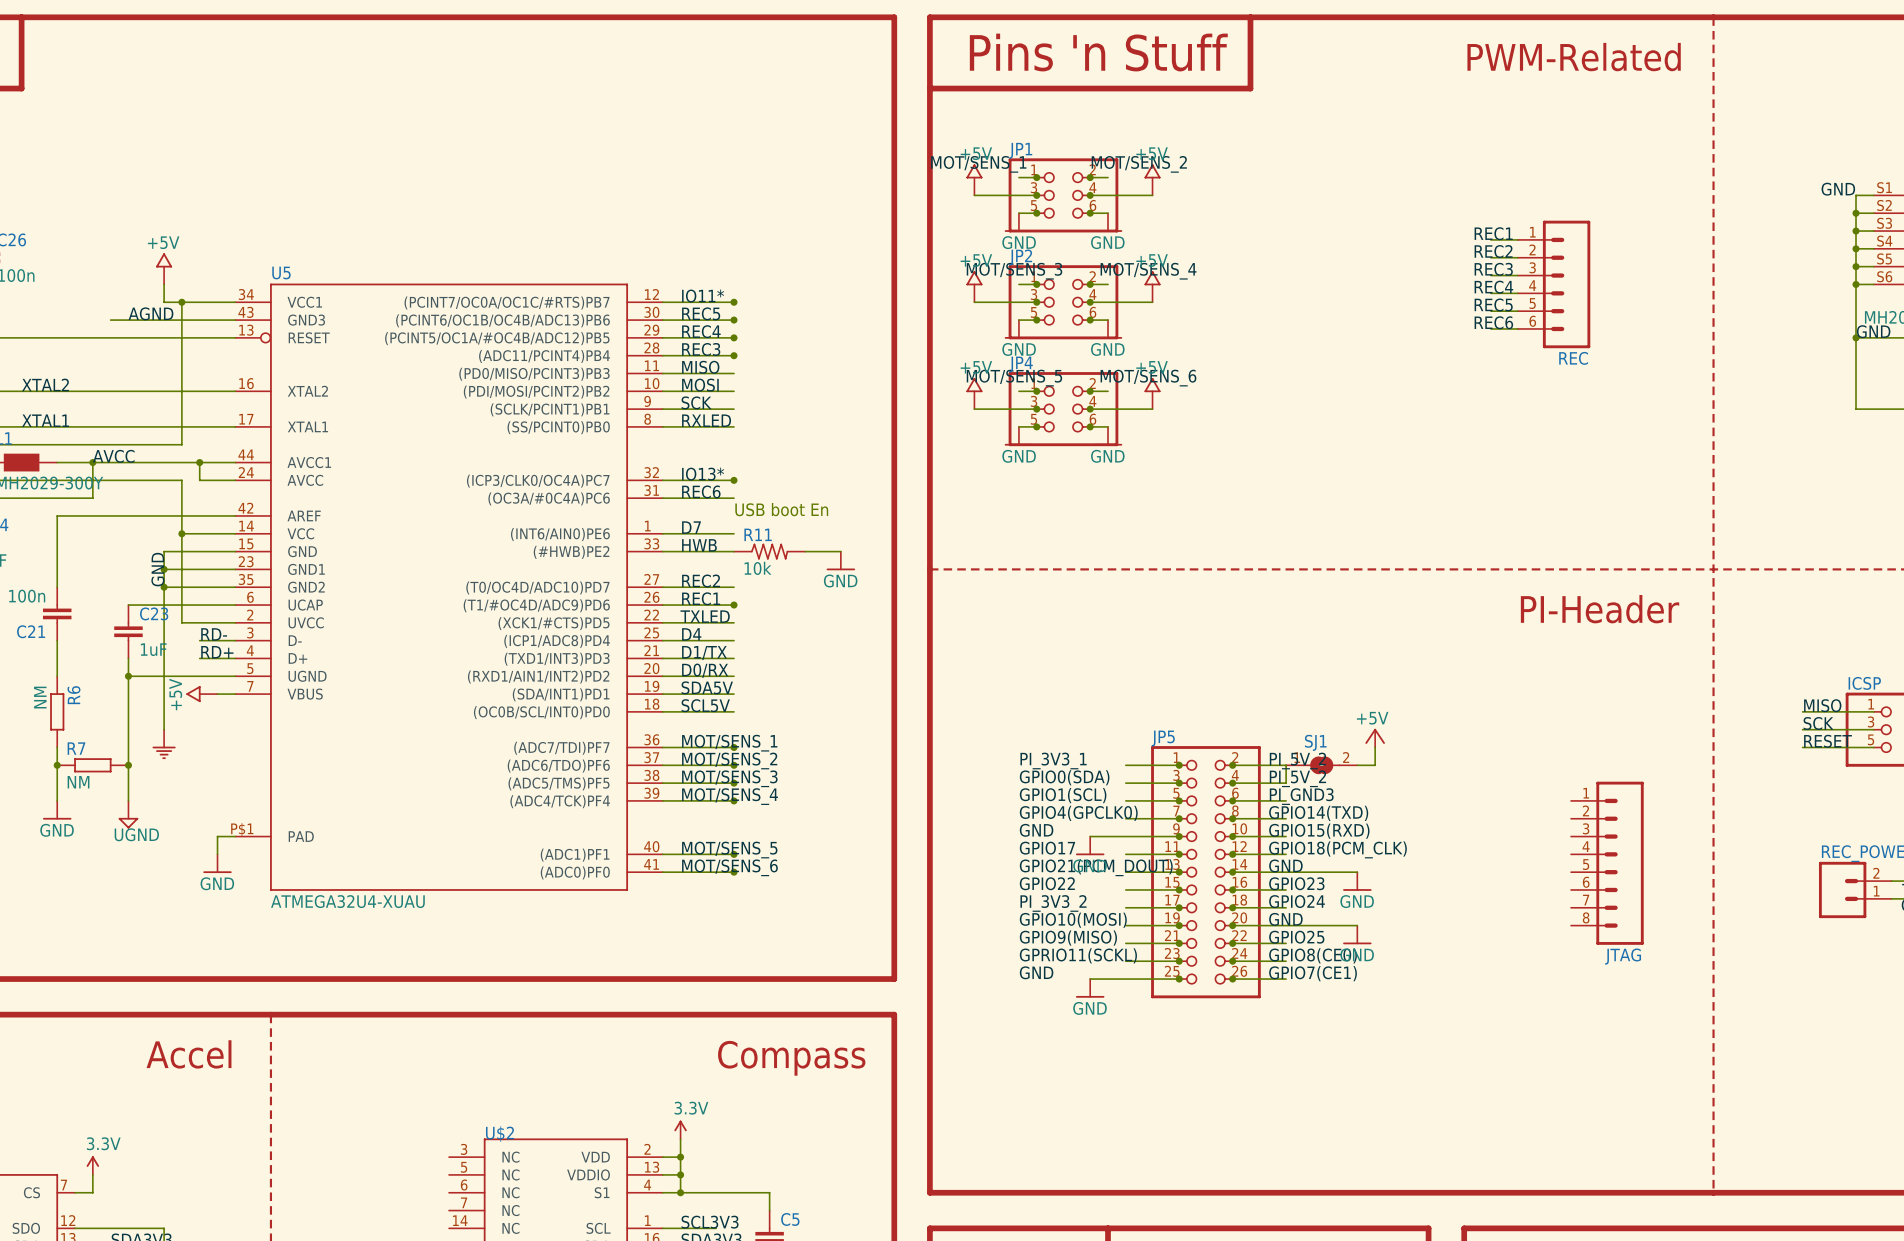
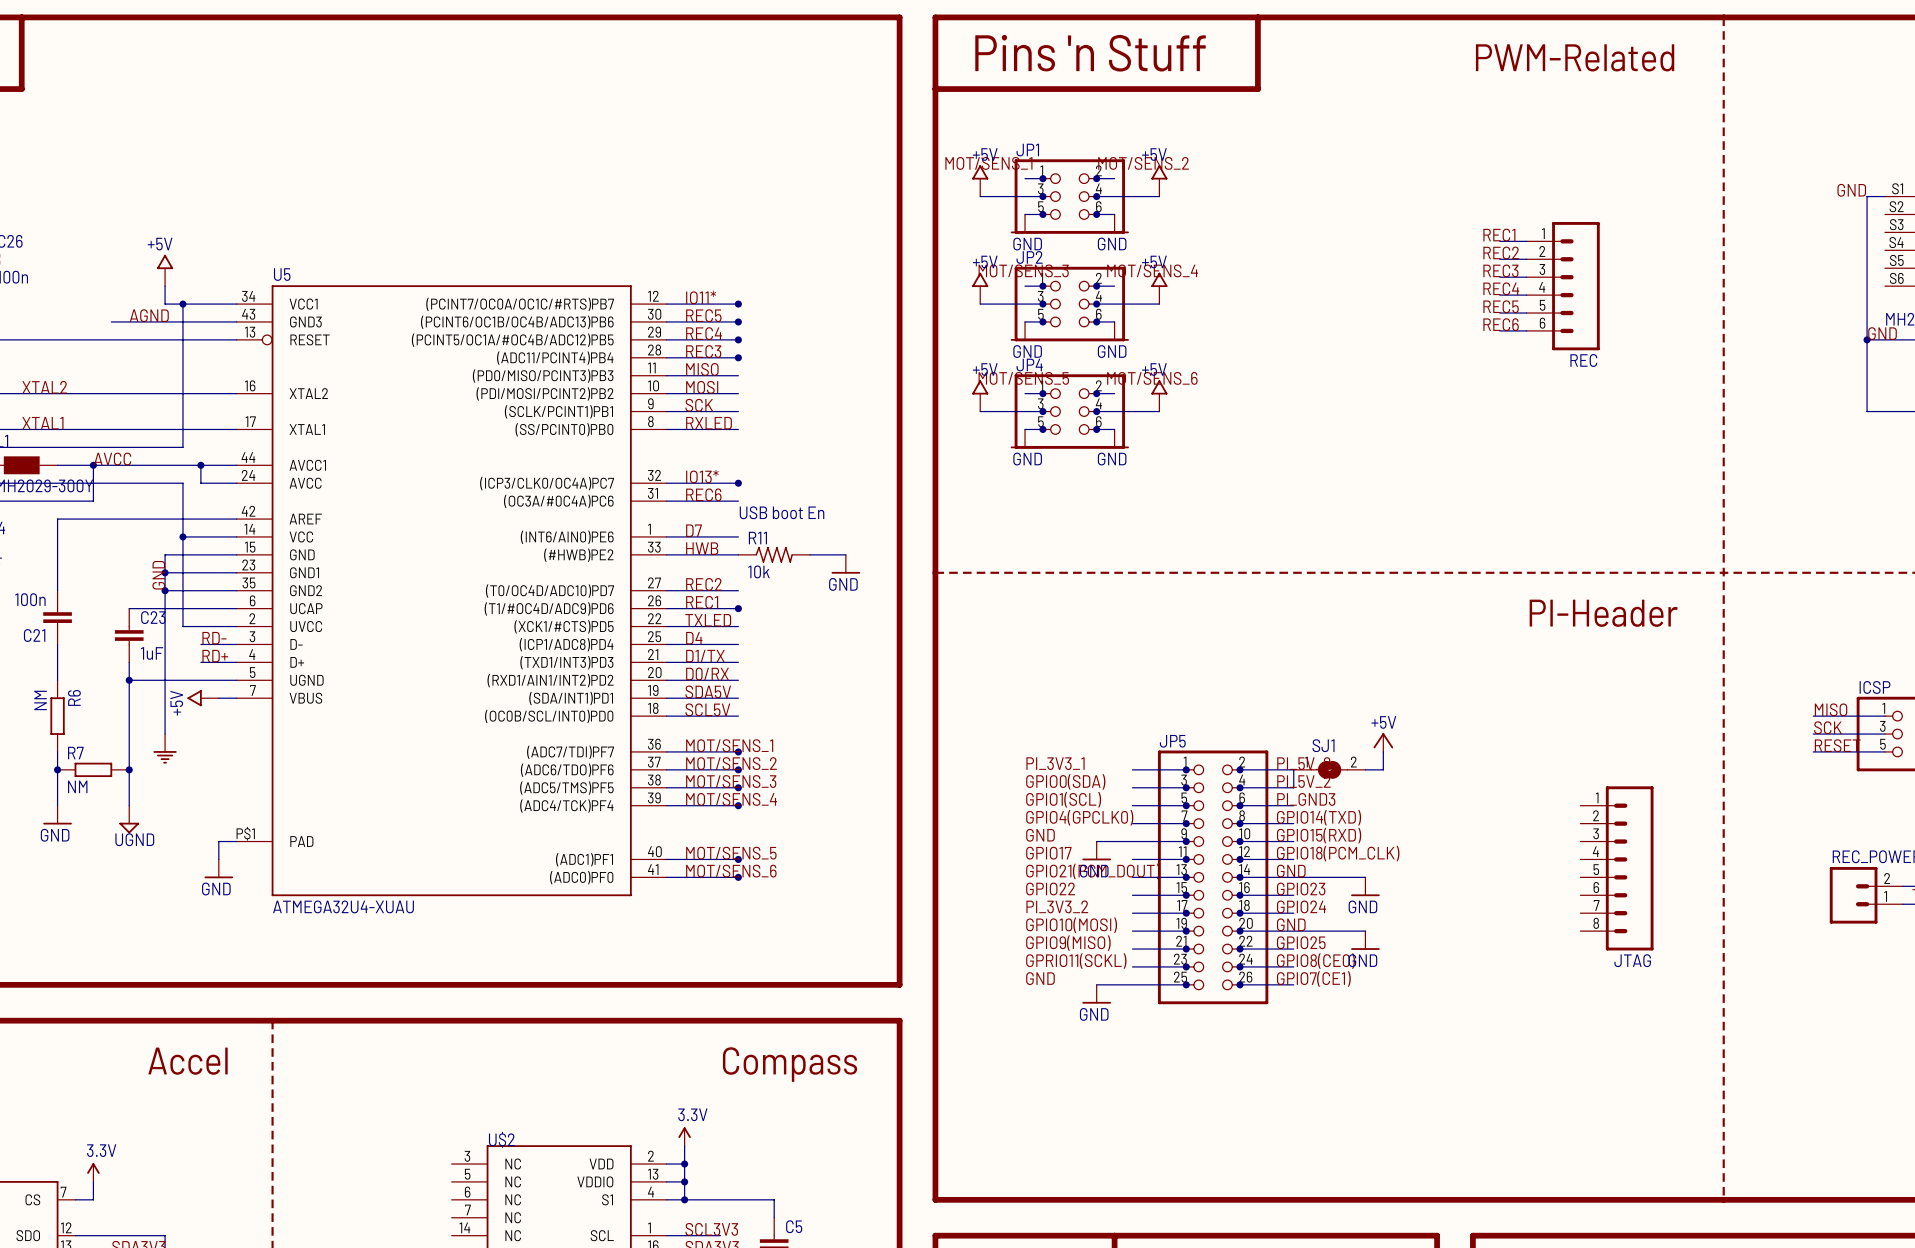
wire: (1856, 213) (1873, 213) -> none
junction: (1856, 213) -> none
wire: (1856, 231) (1873, 231) -> none
junction: (1856, 231) -> none
wire: (1856, 248) (1873, 248) -> none
junction: (1856, 248) -> none
wire: (1856, 266) (1873, 266) -> none
junction: (1856, 266) -> none
wire: (1856, 284) (1873, 284) -> none
junction: (1856, 284) -> none

